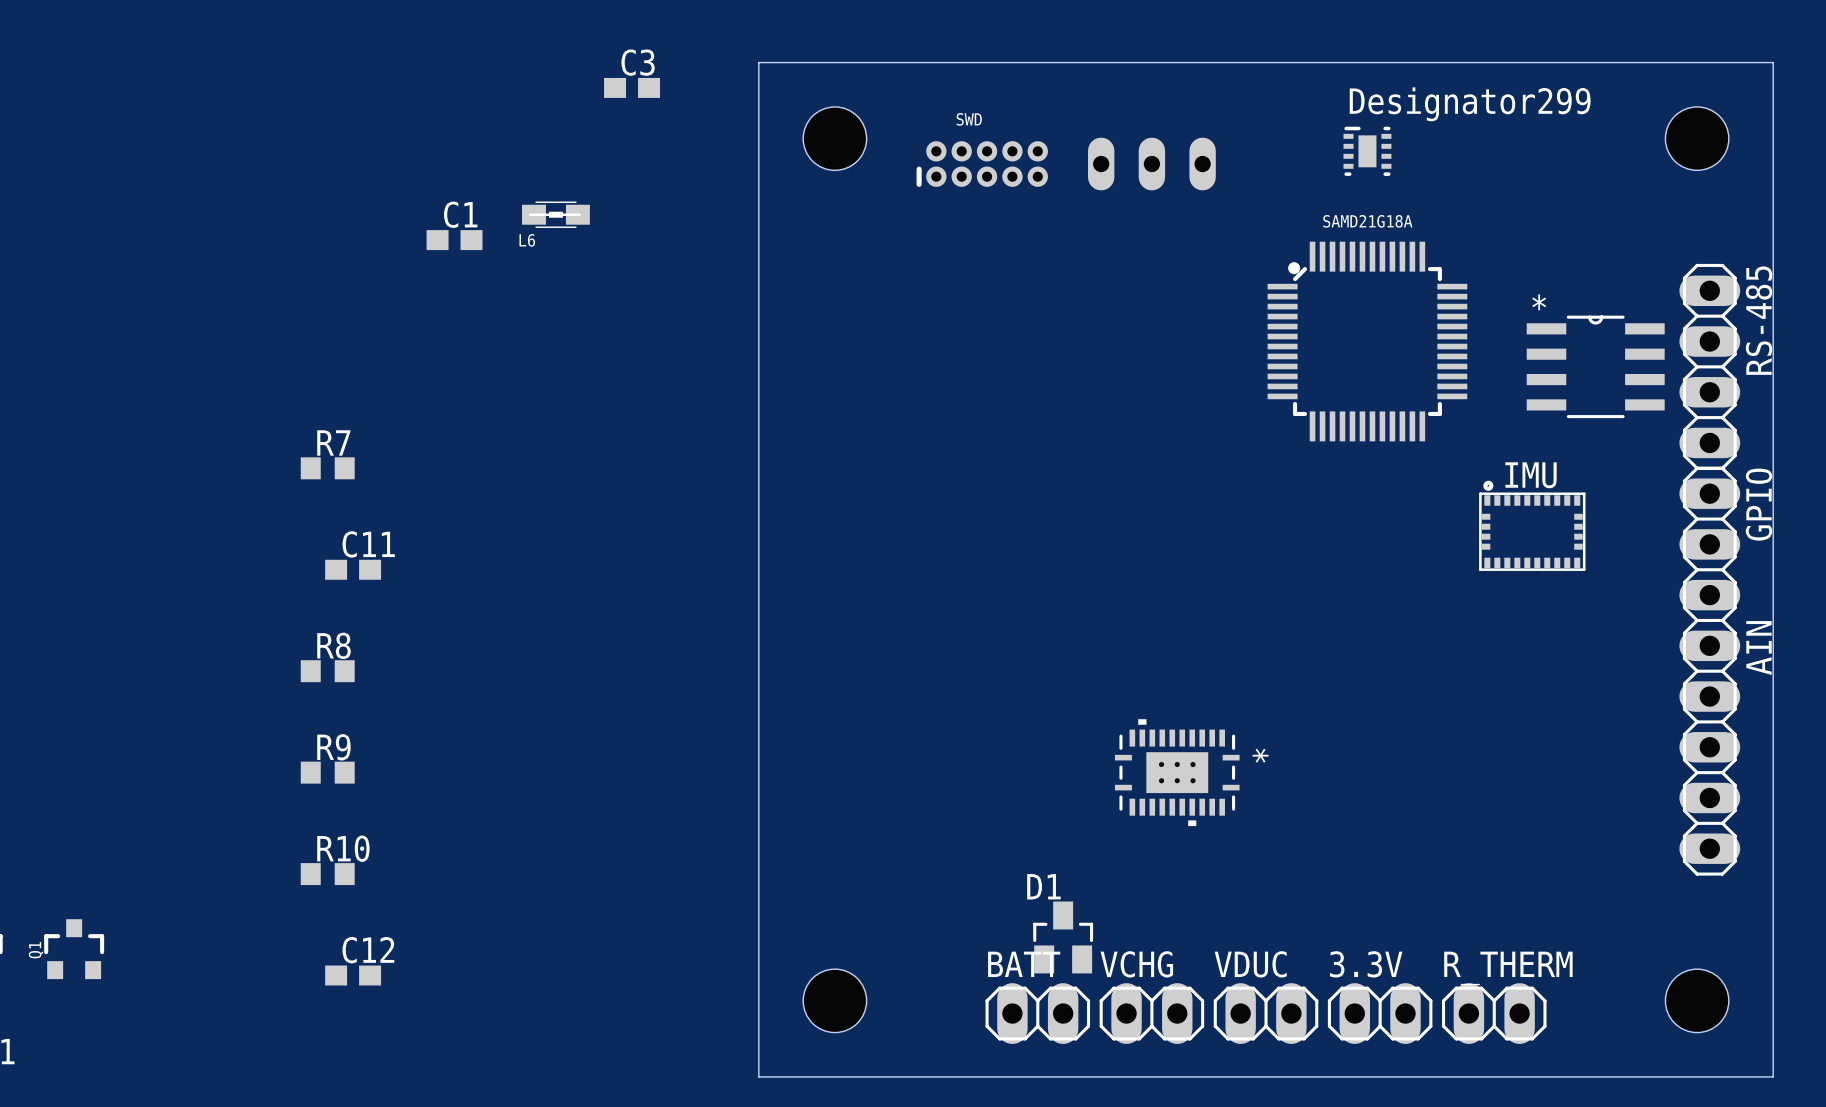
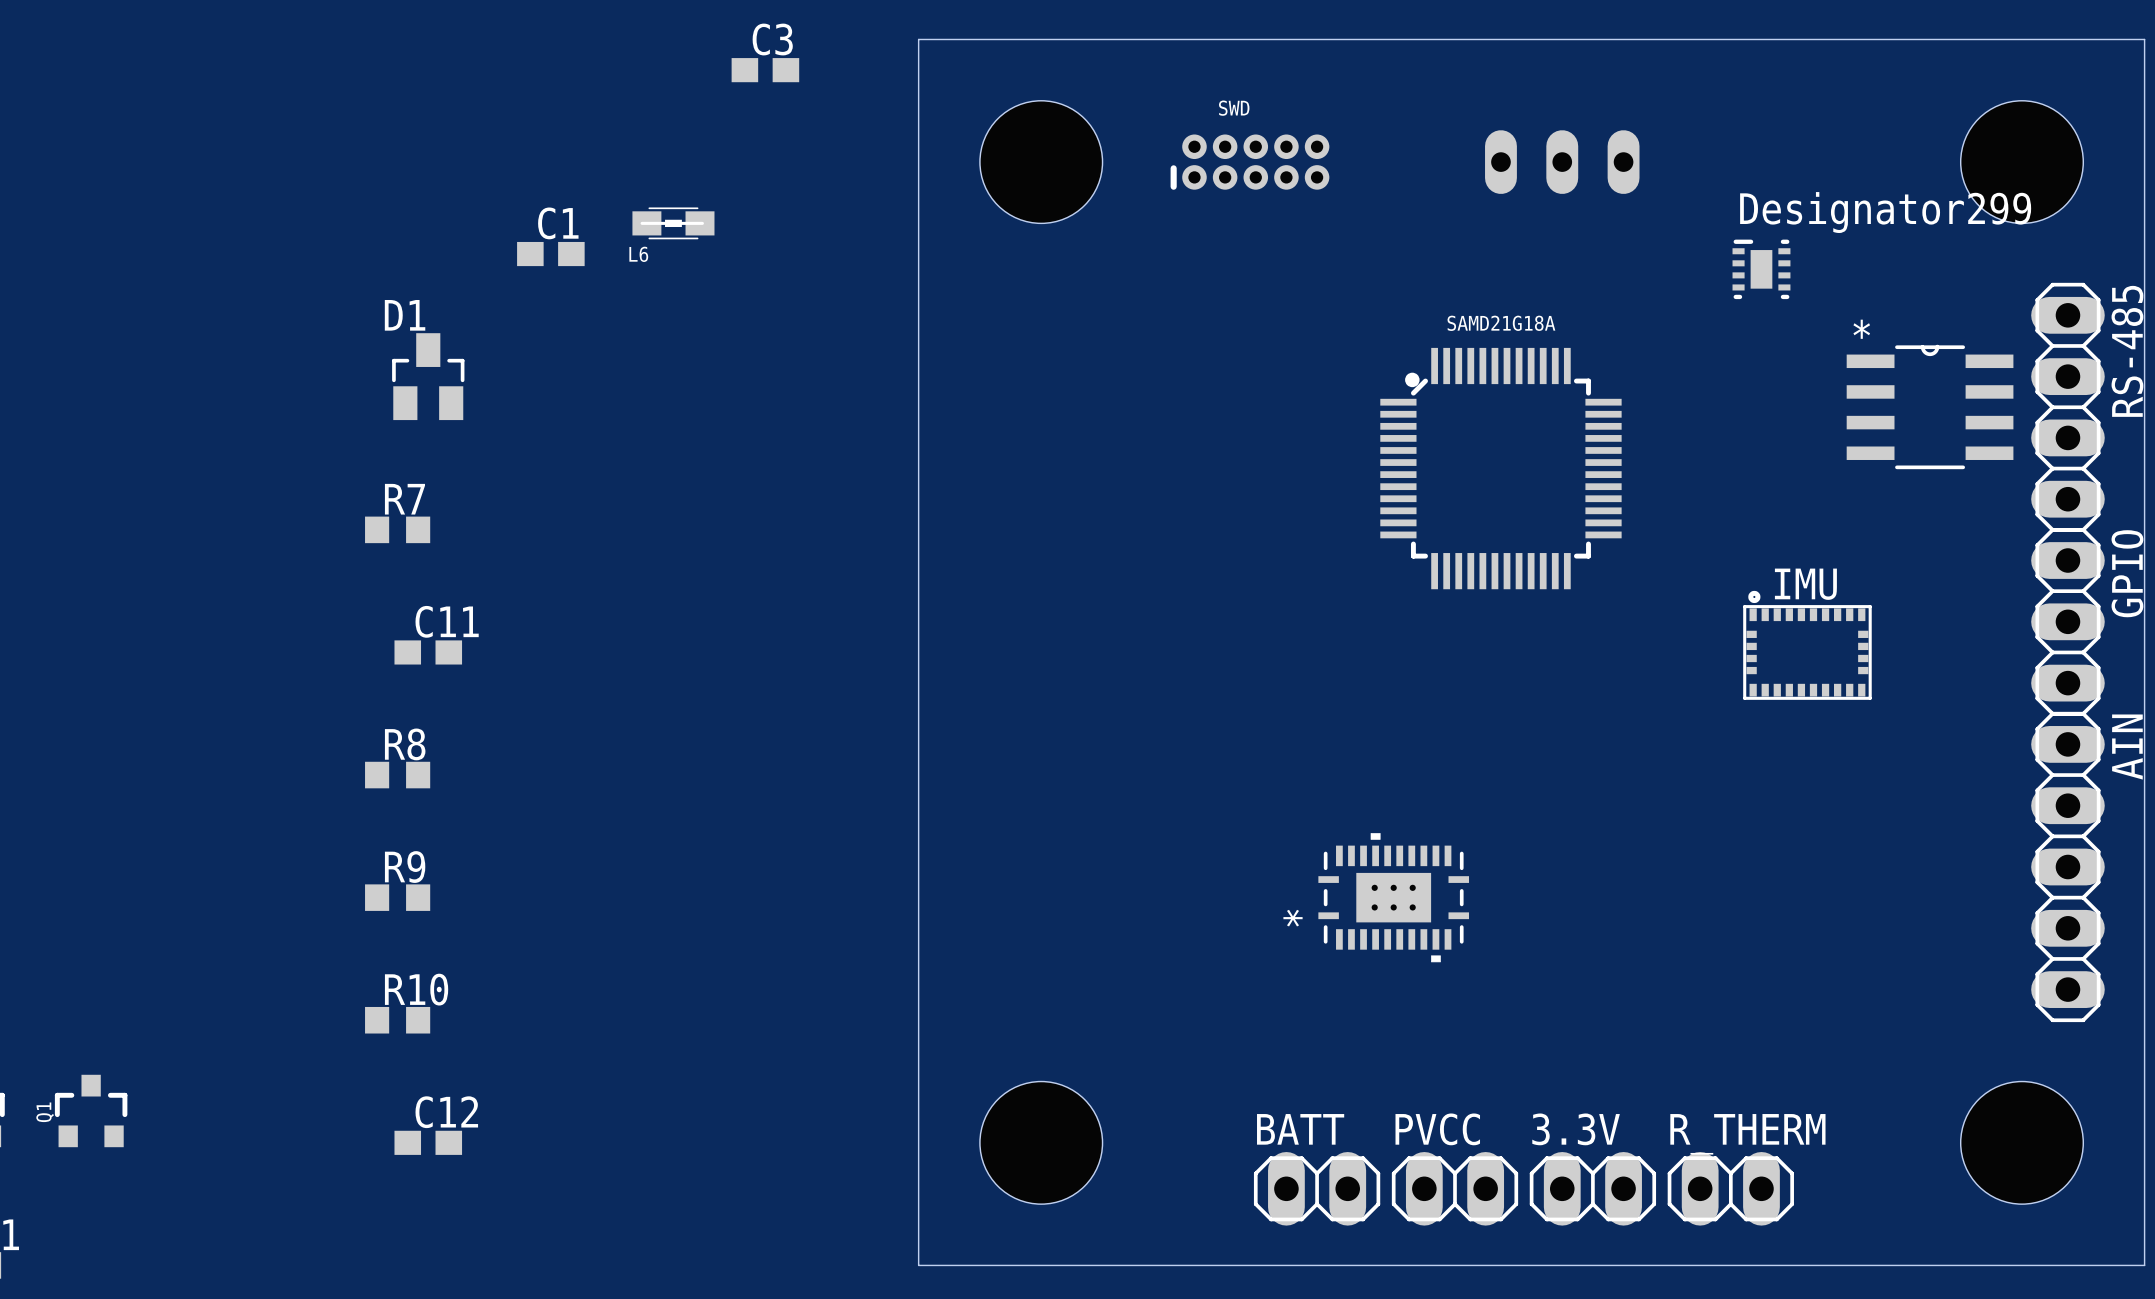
part: (834, 138) -> none
part: (1697, 138) -> none
part position: (1367, 151) -> (1761, 269)
hole: none -> (1041, 162)
SWD position: (982, 164) -> (1249, 162)
part position: (1151, 164) -> (1562, 162)
hole: none -> (2021, 162)
SAMD21G18A position: (1367, 341) -> (1500, 468)
IMU position: (1532, 525) -> (1807, 645)
part rotation: 0° (1177, 772) -> 180° (1393, 897)
D1 position: (1063, 937) -> (428, 376)
hole: none -> (1041, 1142)
hole: none -> (2021, 1142)
part: (834, 1000) -> none
part: (1697, 1000) -> none
BATT position: (1037, 1013) -> (1317, 1188)
VCHG: (1151, 1013) -> none
PVCC: none -> (1454, 1188)
VDUC: (1266, 1013) -> none
3.3V position: (1380, 1013) -> (1592, 1188)
R_THERM position: (1494, 1013) -> (1730, 1188)

